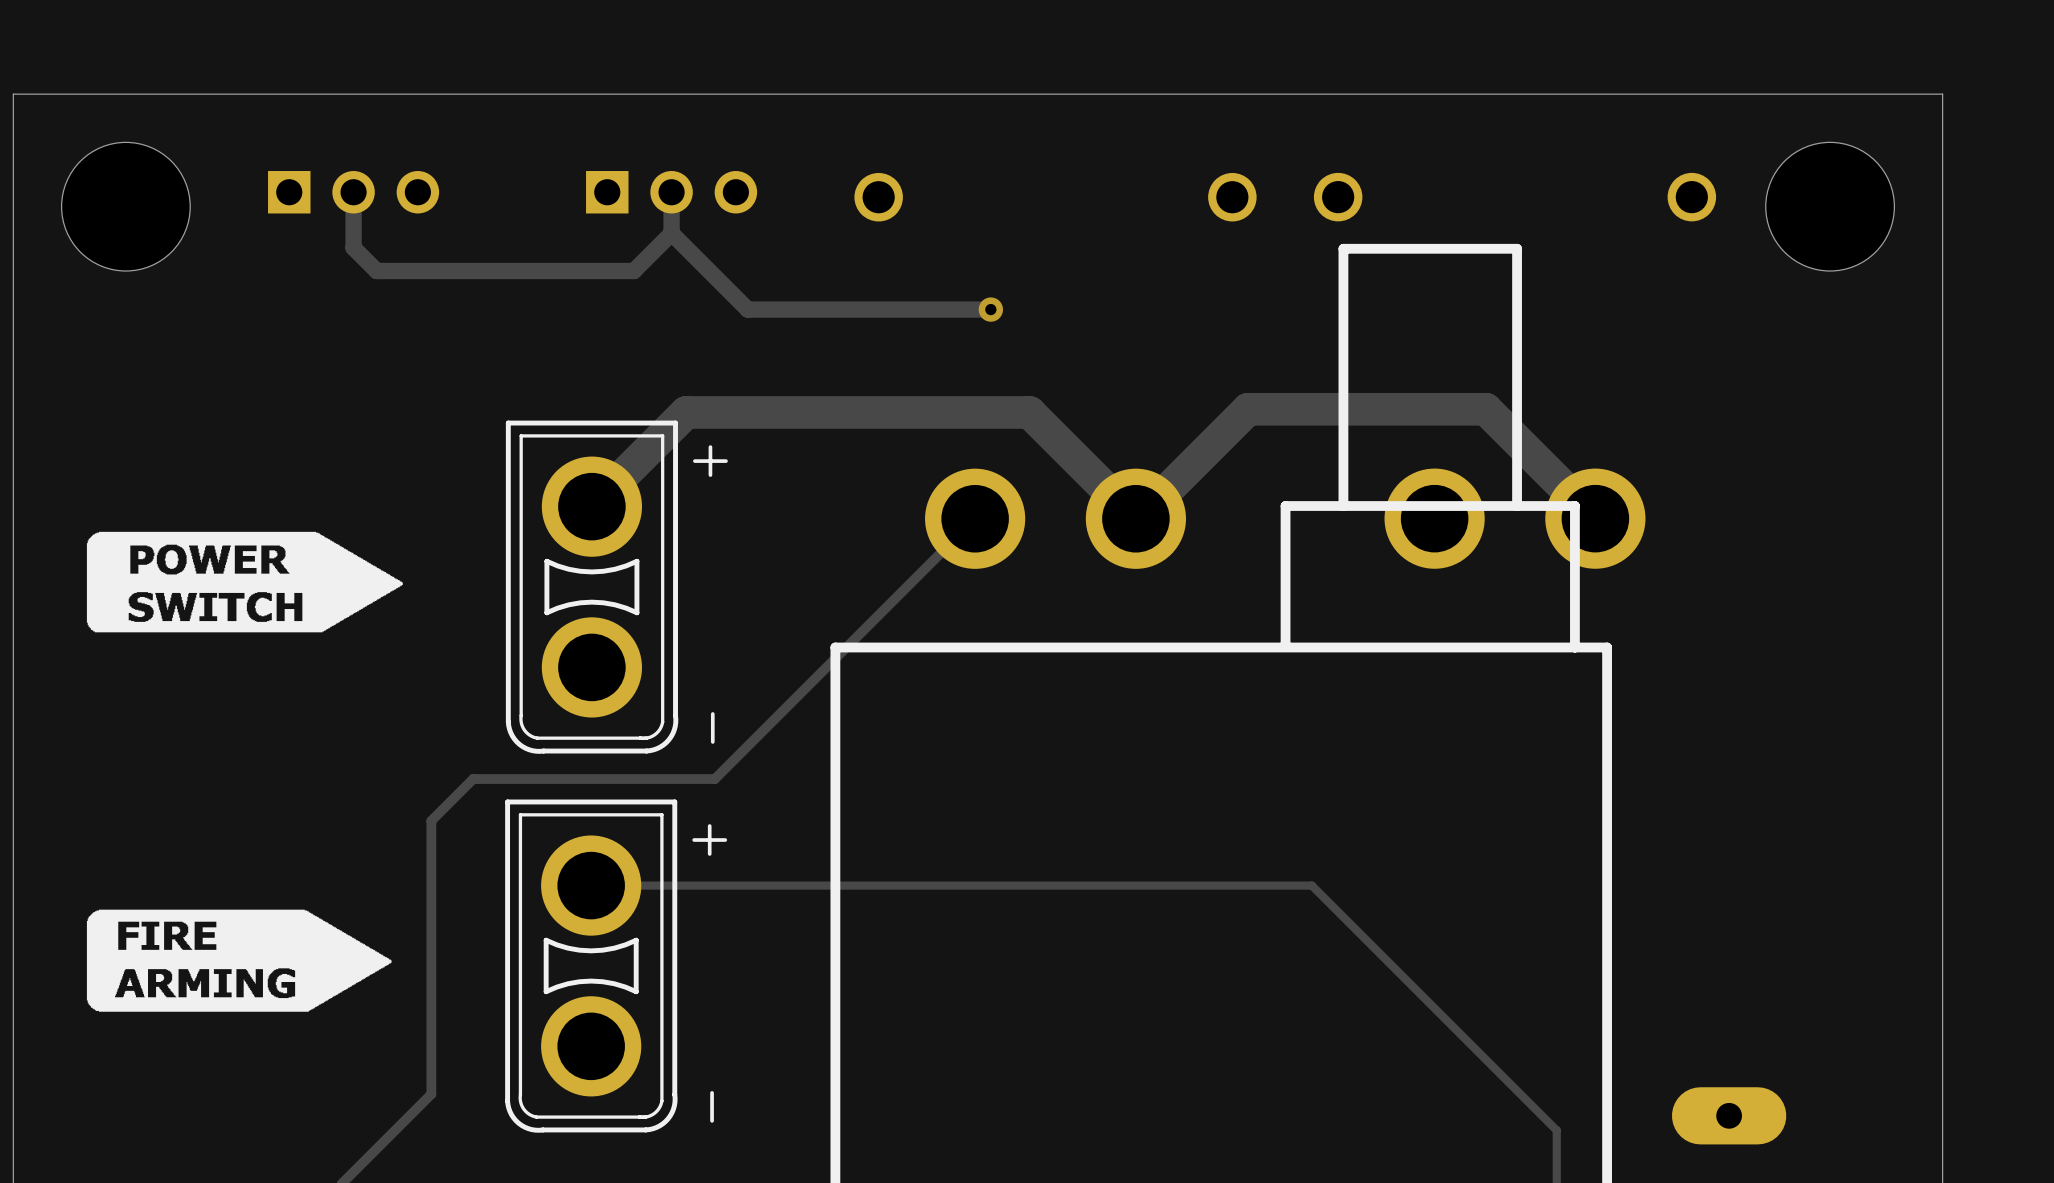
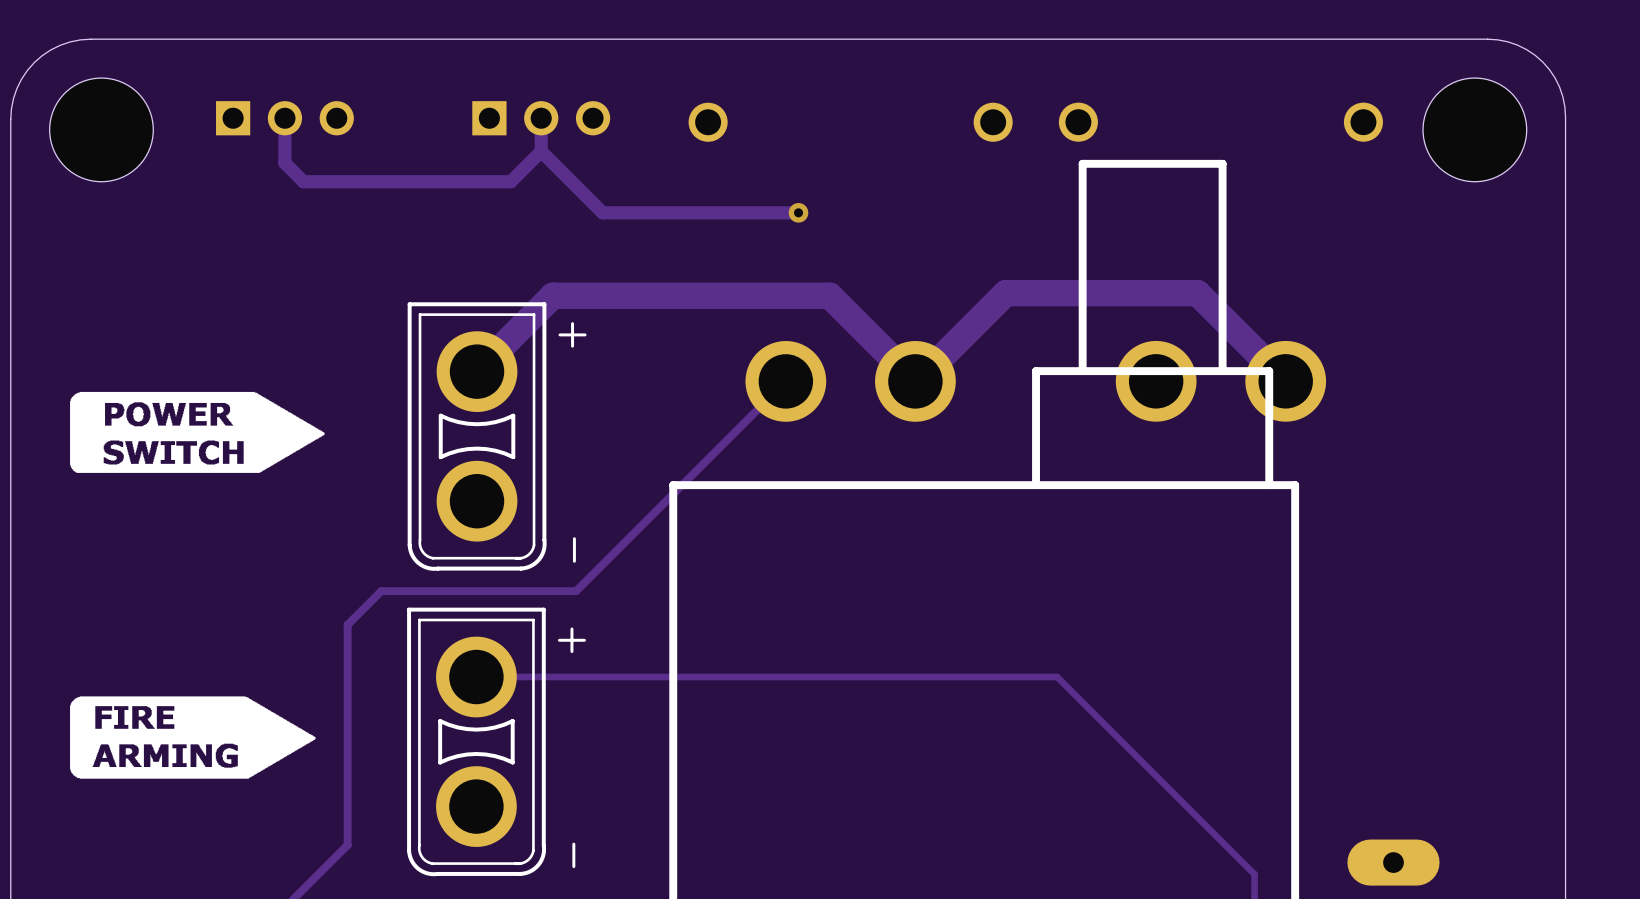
board edge: (112, 94) (13, 94) (13, 193) -> (90, 39) (60, 45) (34, 62) (16, 88) (10, 119)
board edge: (1846, 94) (1942, 94) (1942, 190) -> (1487, 39) (1517, 45) (1542, 61) (1559, 87) (1565, 117)

